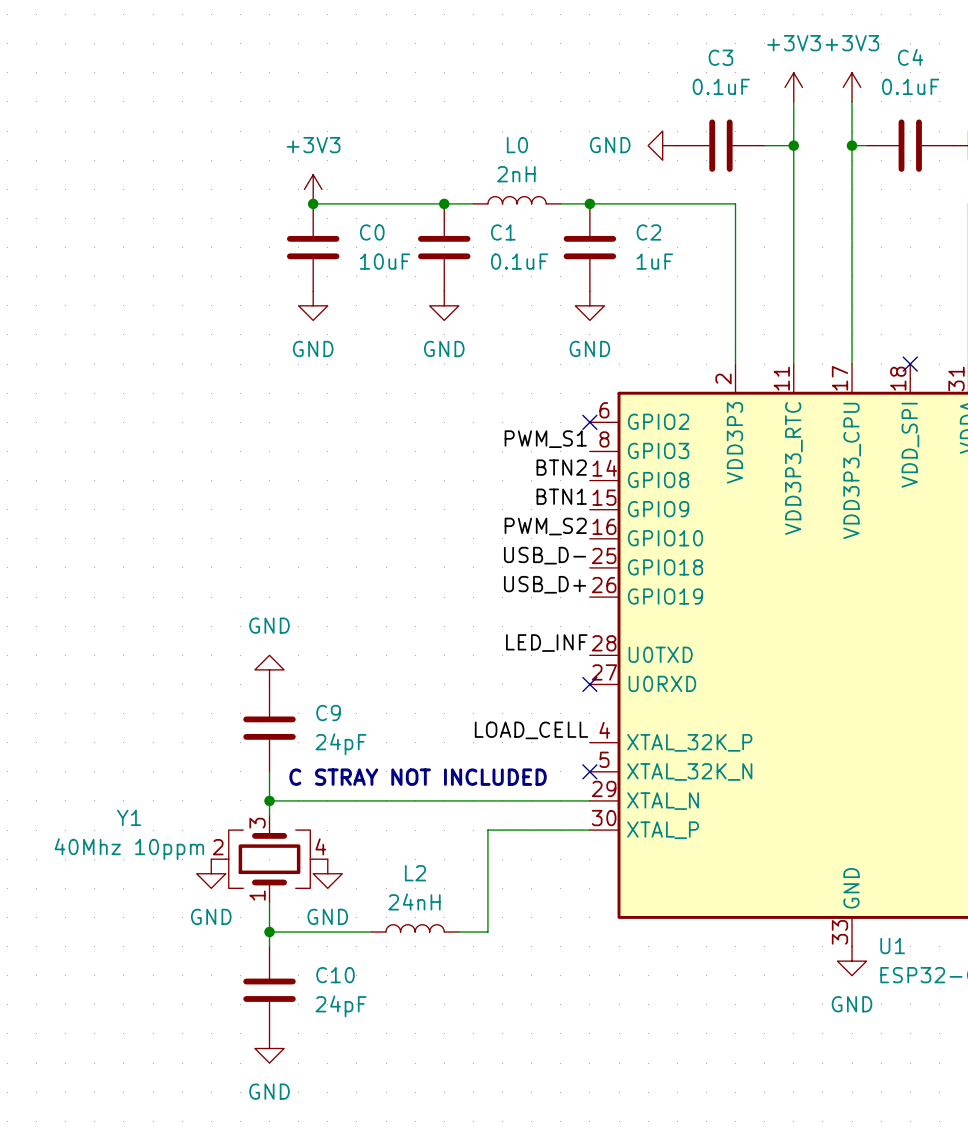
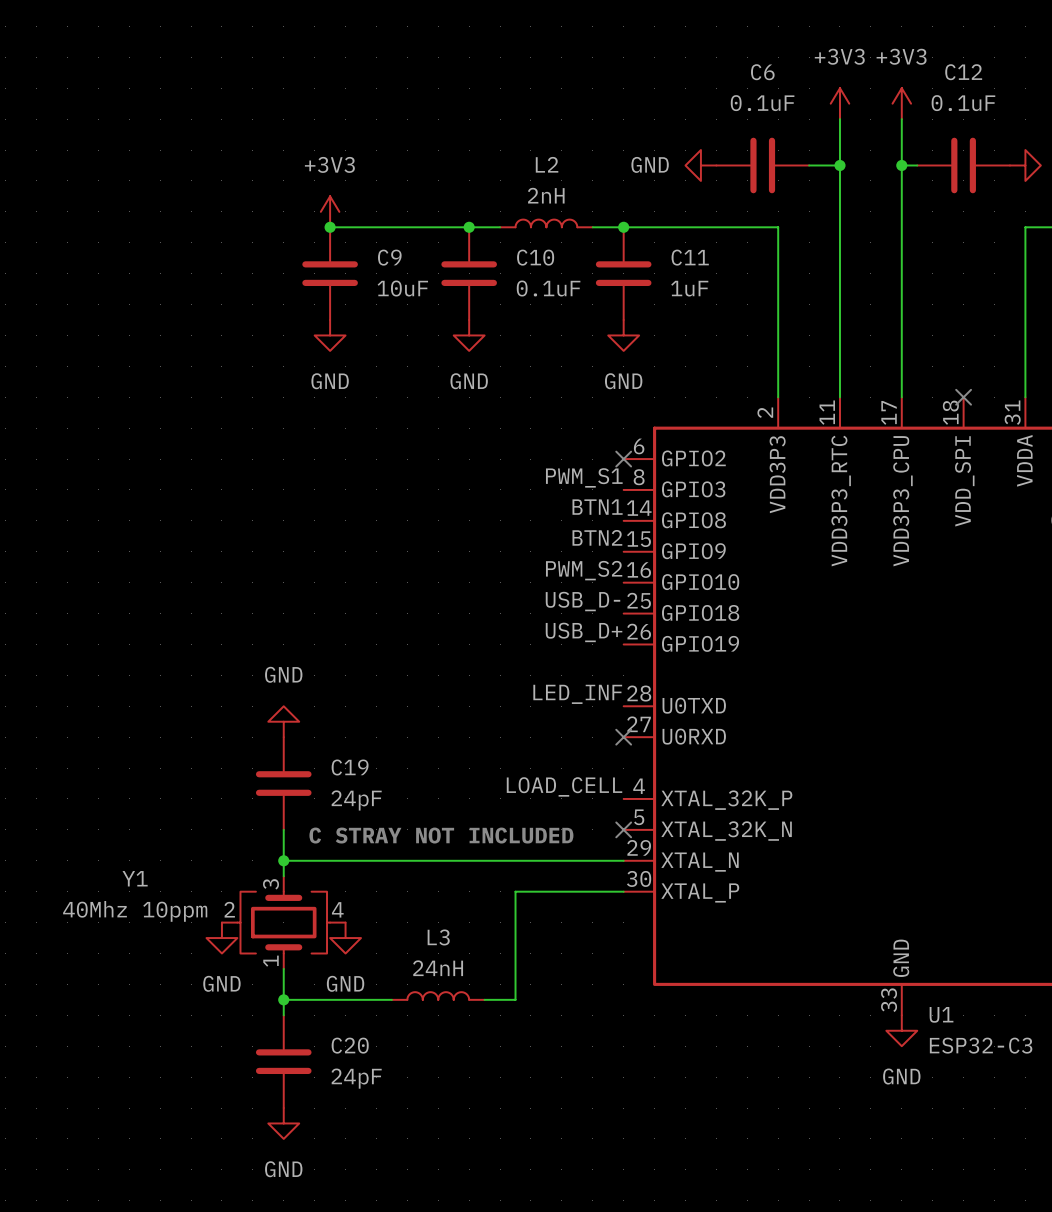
C3 name: C3 (720, 57) -> C6 (762, 72)
C4 name: C4 (910, 57) -> C12 (963, 72)
L0 name: L0 (517, 145) -> L2 (547, 164)
C0 name: C0 (372, 232) -> C9 (389, 257)
C1 name: C1 (503, 232) -> C10 (535, 257)
C2 name: C2 (648, 232) -> C11 (690, 257)
label: BTN2 (561, 467) -> BTN1 (597, 507)
label: BTN1 (561, 496) -> BTN2 (597, 537)
C9 name: C9 (328, 713) -> C19 (350, 767)
L2 name: L2 (415, 873) -> L3 (438, 937)
C10 name: C10 (335, 975) -> C20 (350, 1045)

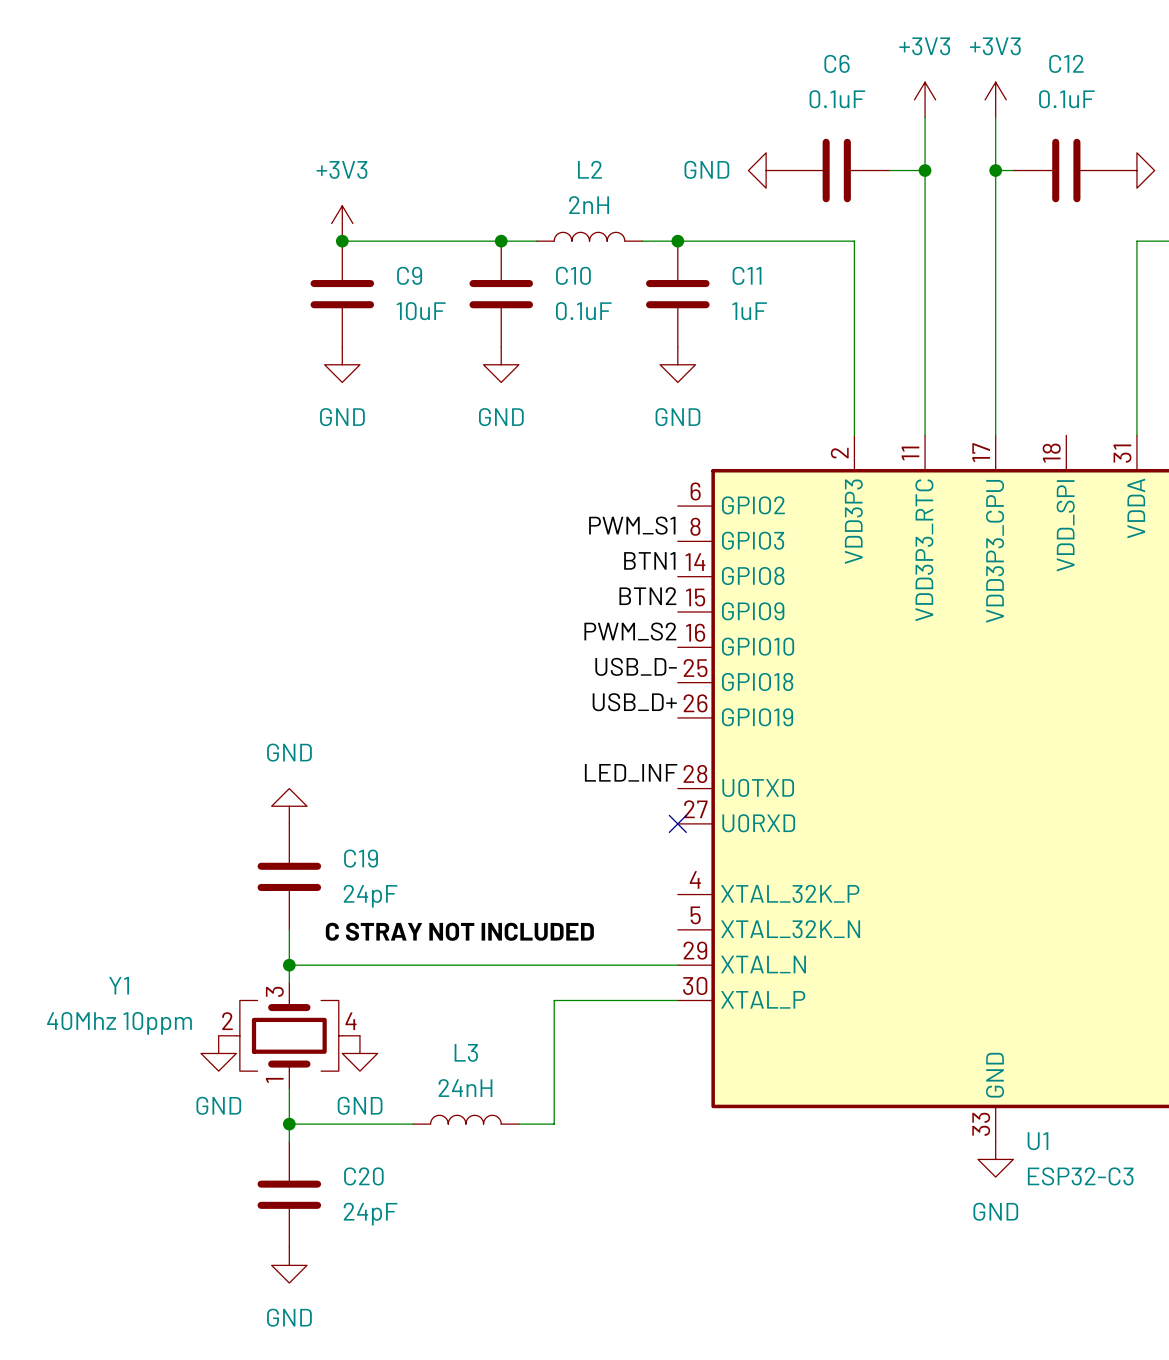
no-connect mark: (963, 397) -> none
no-connect mark: (623, 459) -> none
label: LOAD_CELL (564, 786) -> none
no-connect mark: (623, 829) -> none
label: none -> C STRAY NOT INCLUDED (459, 931)
text: C STRAY NOT INCLUDED (441, 835) -> none

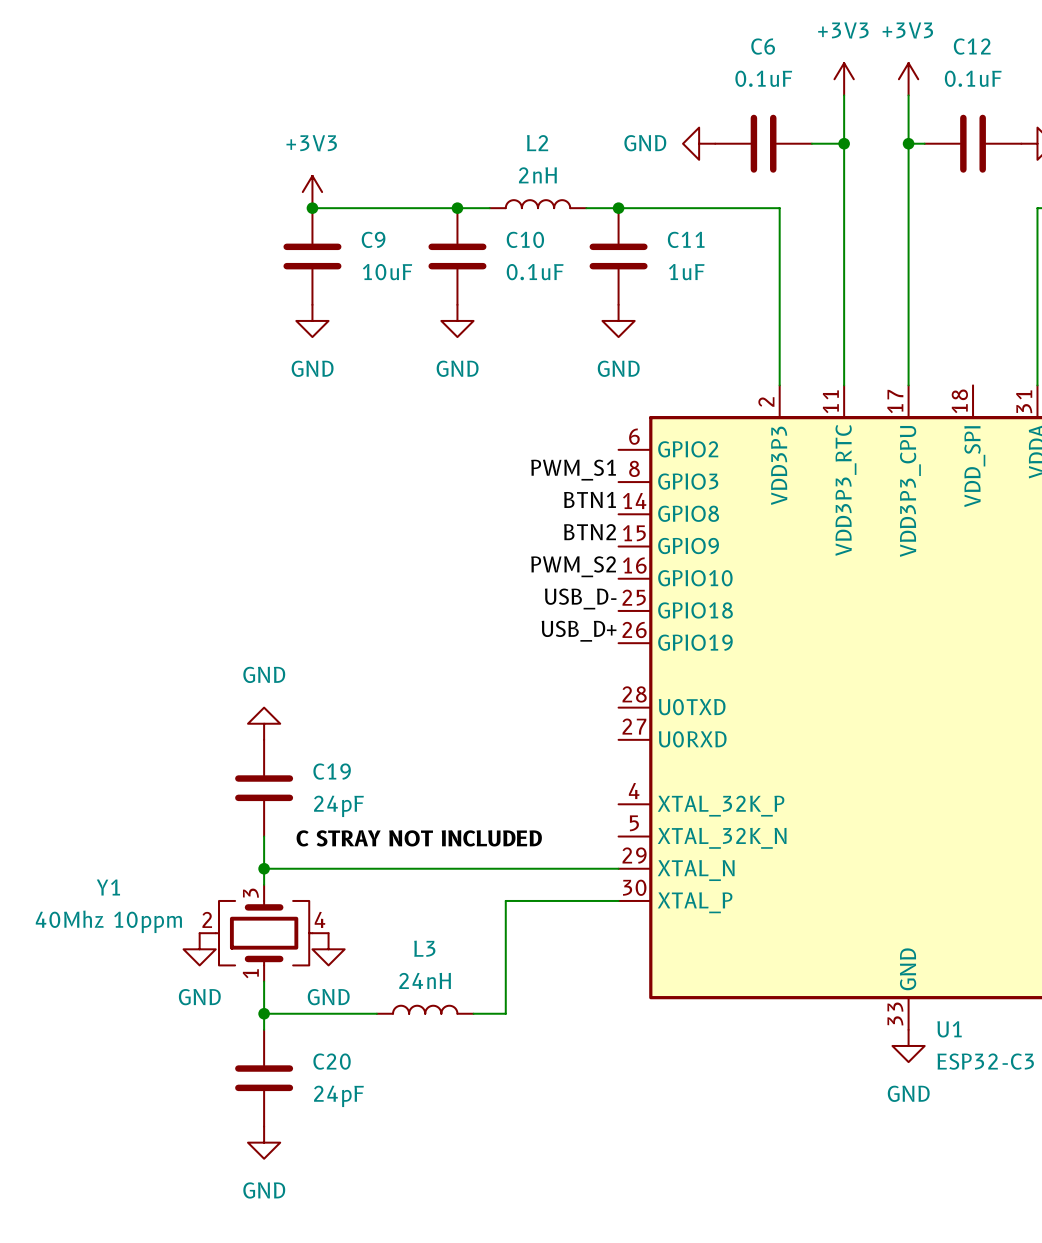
label: LED_INF (631, 772) -> none
no-connect mark: (677, 823) -> none

